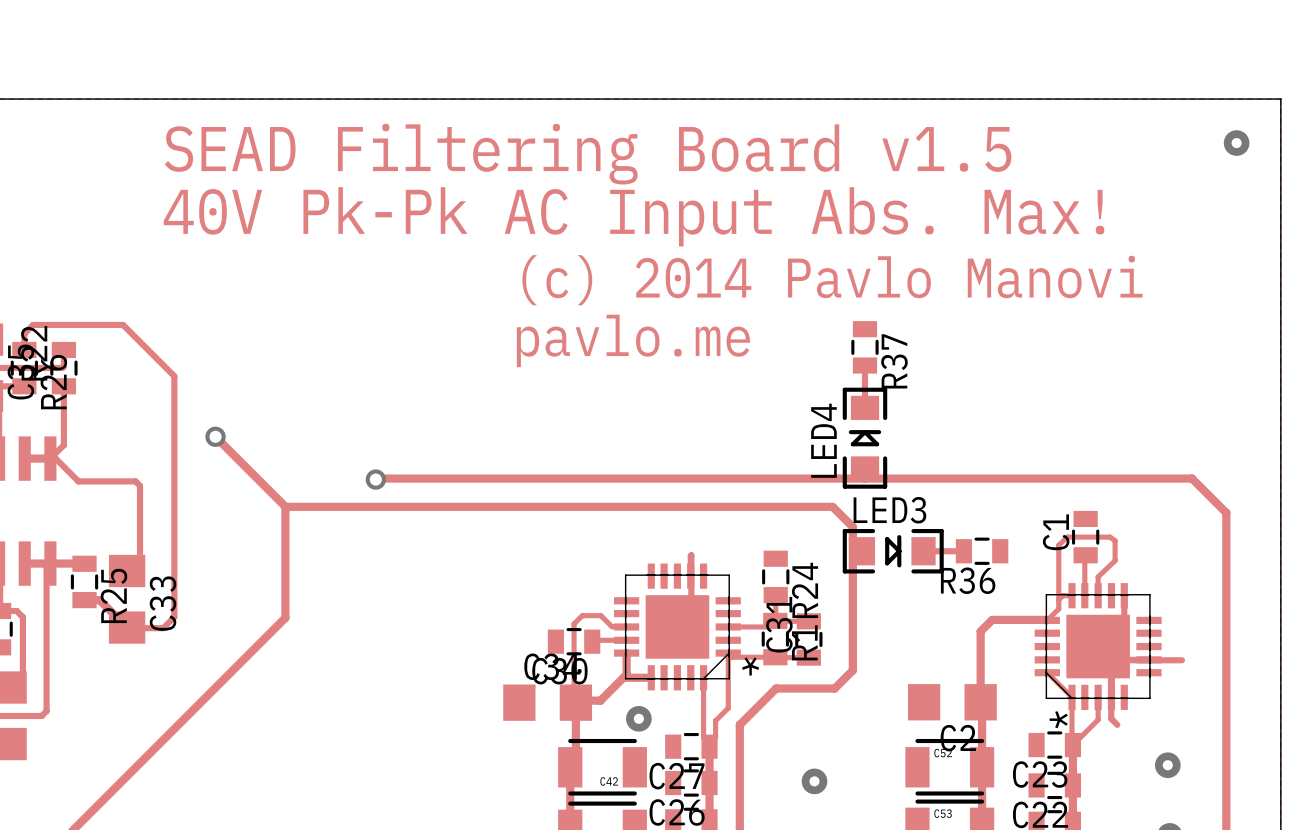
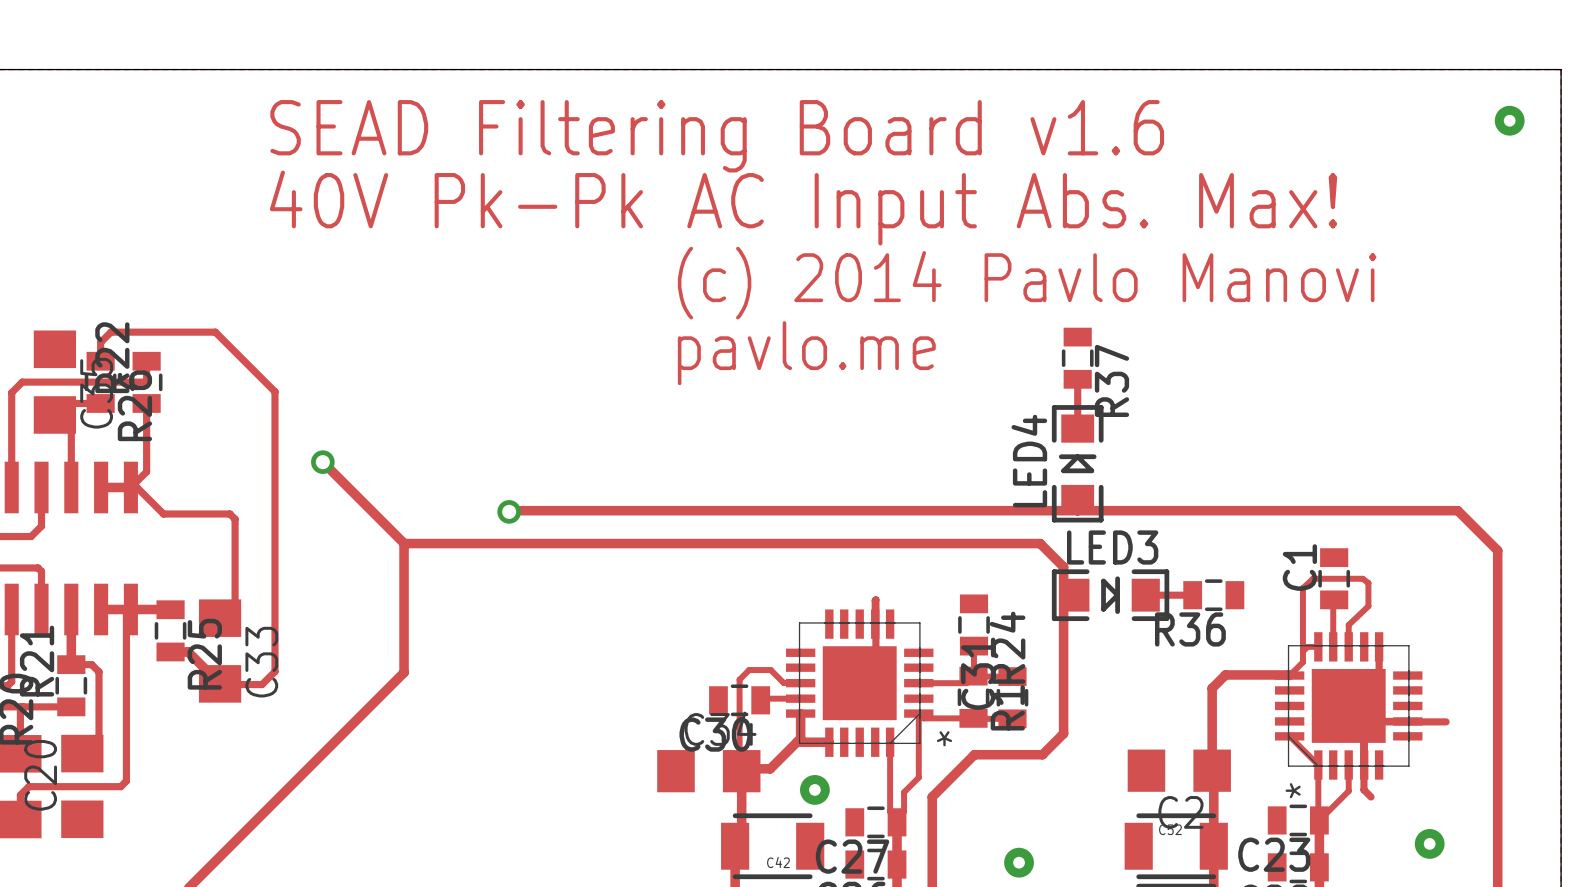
text: SEAD Filtering Board v1.5 (588, 154) -> SEAD Filtering Board v1.6 (717, 136)

